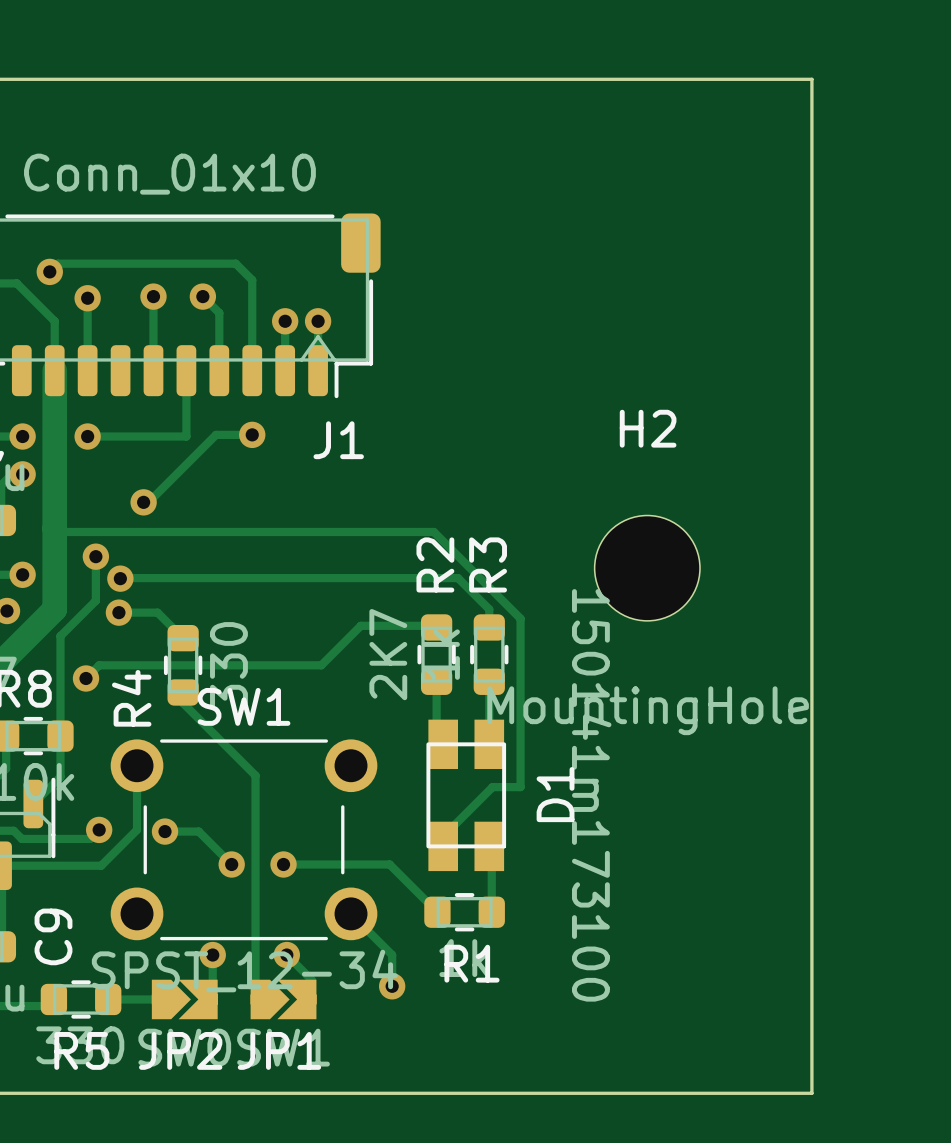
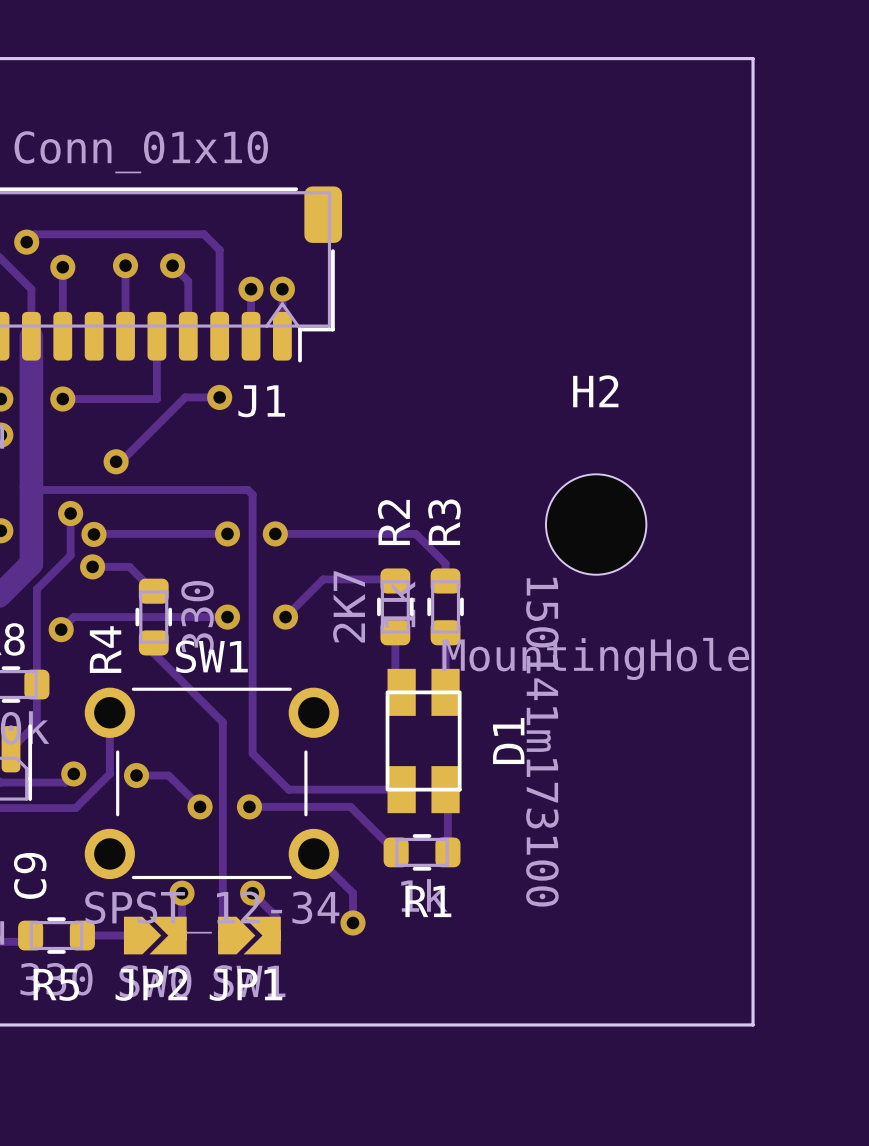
J1 name position: J1 (338, 440) -> J1 (261, 401)
track: (281, 531) (433, 531) (520, 618) (520, 787) (492, 787) (443, 836) (443, 846) -> (247, 490) (252, 494) (252, 753) (288, 789) (401, 789)
track: (260, 578) (310, 578) -> none
via: none -> (227, 533)
via: none -> (275, 533)
track: (260, 665) (321, 665) -> none
via: none -> (227, 617)
via: none -> (285, 617)

